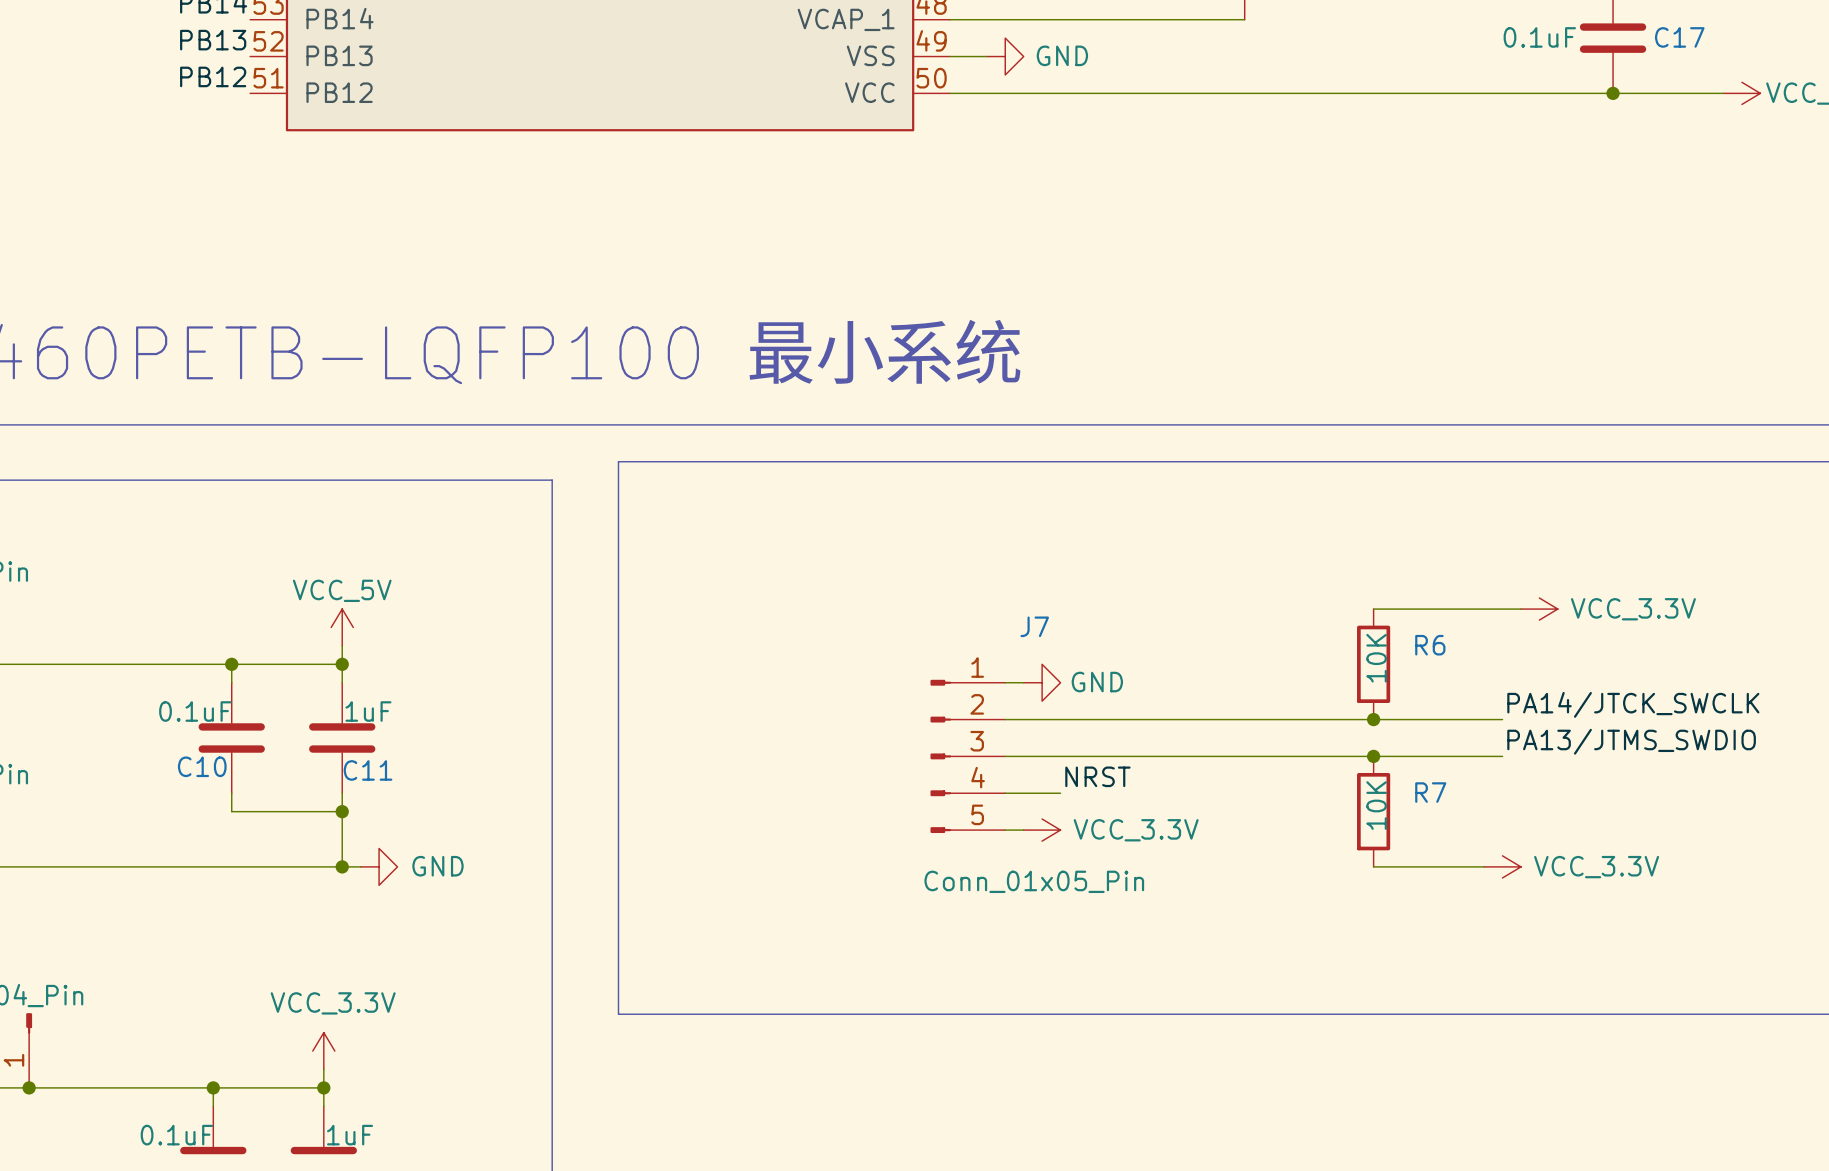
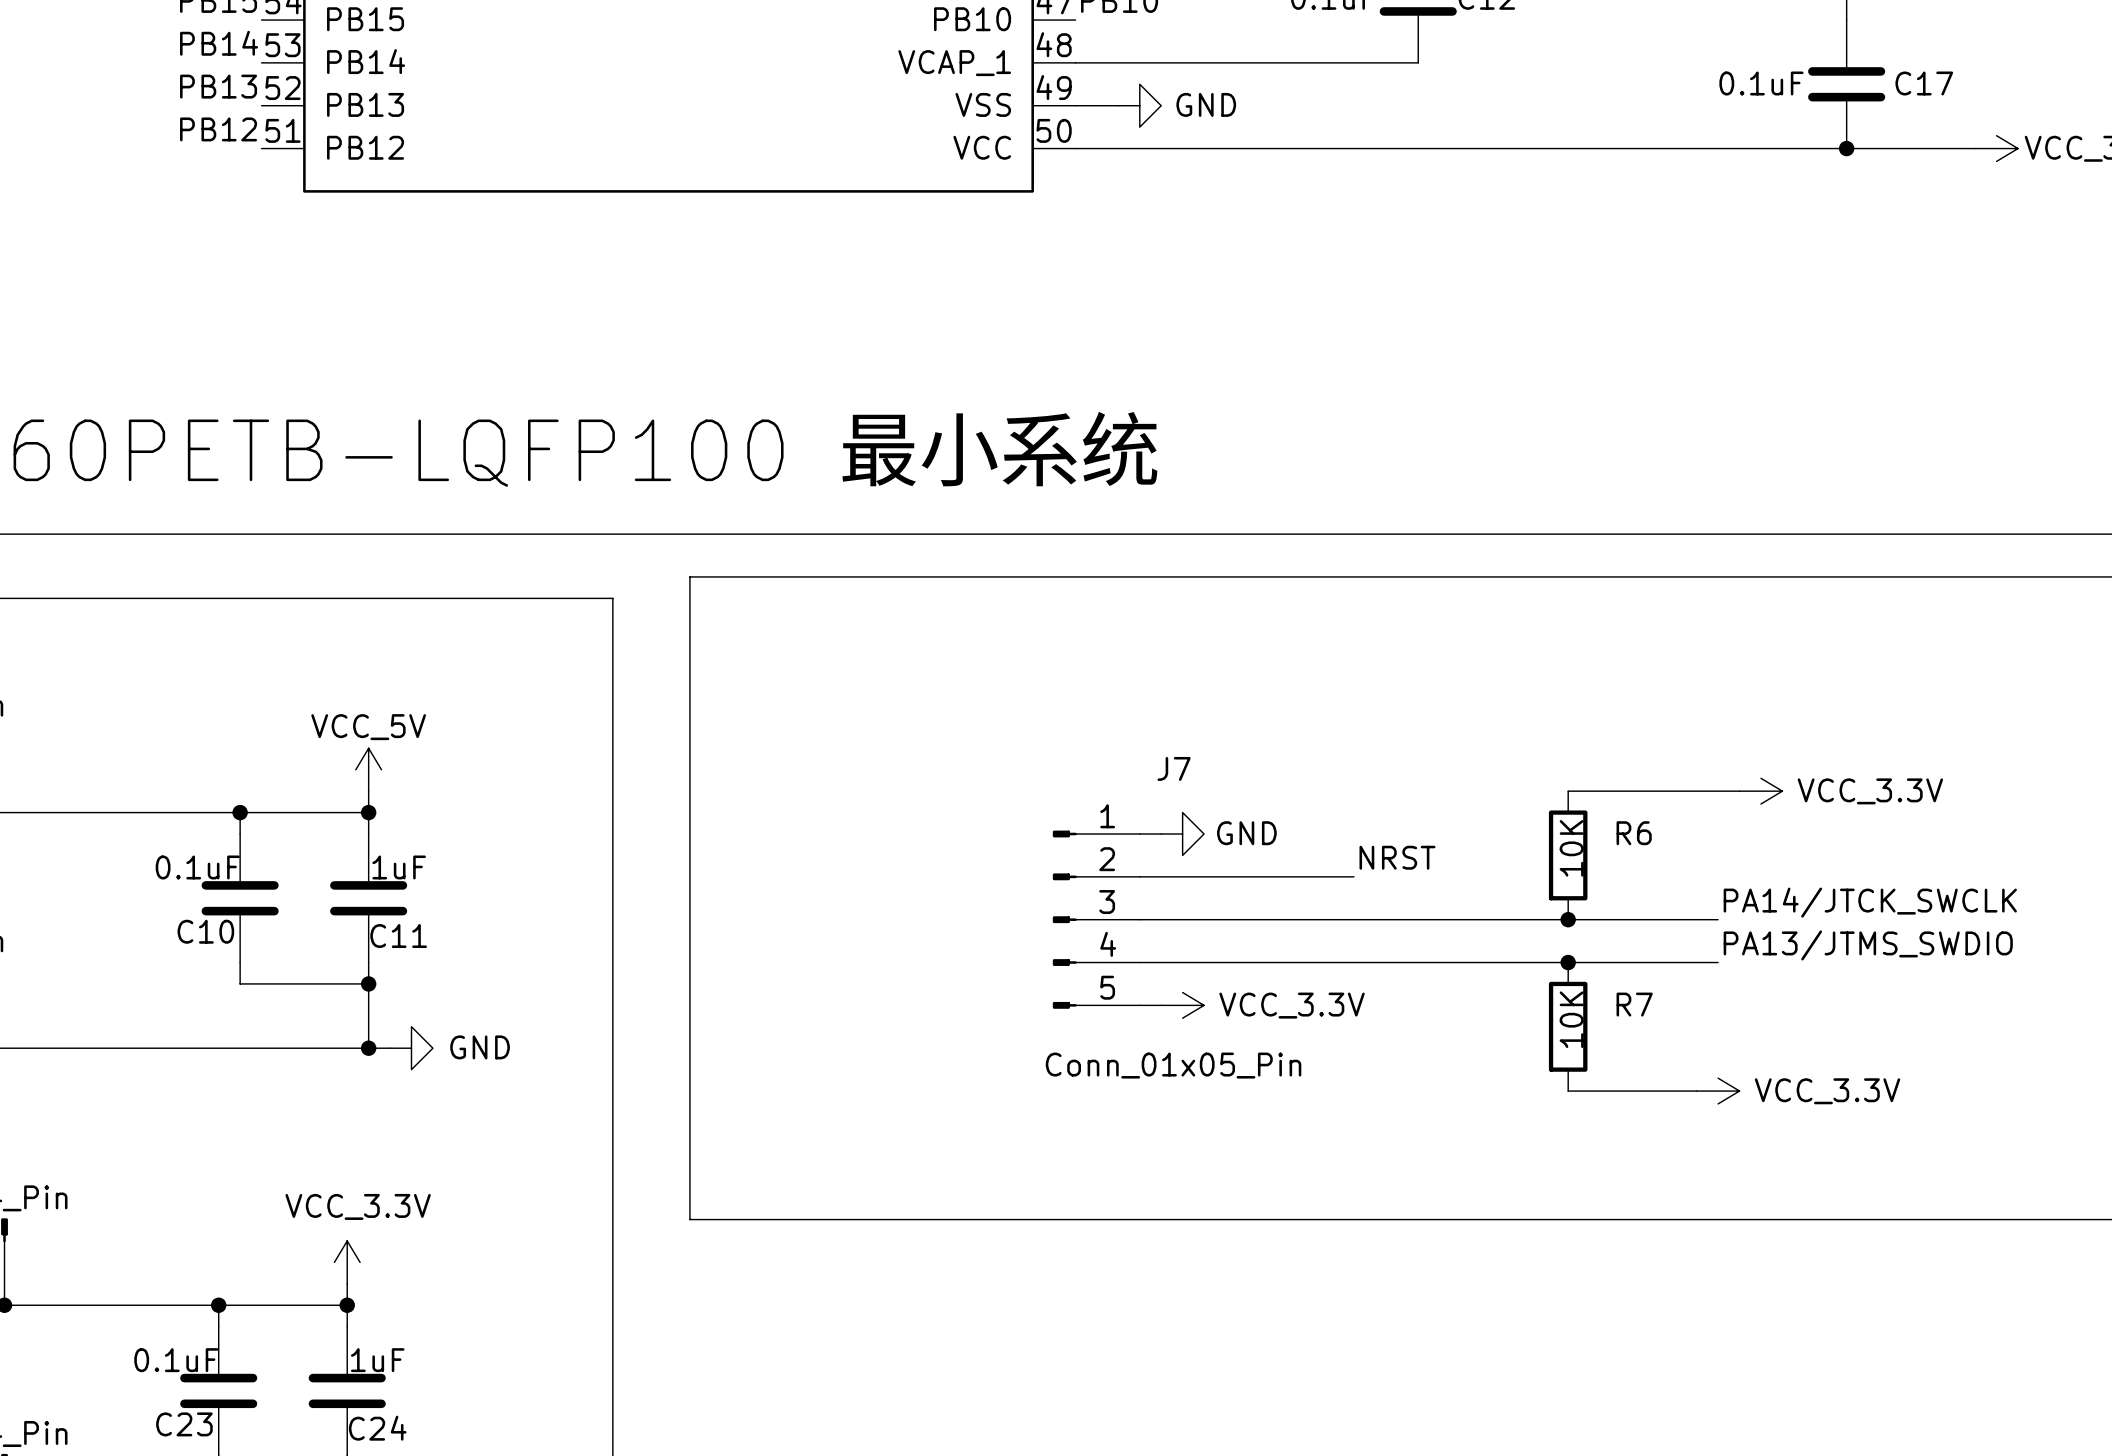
wire: (1373, 609) (1520, 609) -> (1568, 791) (1739, 791)
power symbol position: VCC_3.3V (1539, 609) -> VCC_3.3V (1760, 791)
R6 position: (1373, 664) -> (1568, 855)
label: PA14/JTCK_SWCLK (1633, 704) -> none
wire: (1189, 719) (1502, 719) -> none
junction position: (1373, 719) -> (1568, 962)
label: PA13/JTMS_SWDIO (1631, 741) -> PA14/JTCK_SWCLK (1870, 902)
label position: NRST (1097, 776) -> NRST (1397, 857)
label: none -> PA13/JTMS_SWDIO (1868, 945)
wire: none -> (1204, 962) (1718, 962)
R7 position: (1373, 811) -> (1568, 1026)
wire: (1373, 866) (1484, 866) -> (1568, 1091) (1696, 1091)
power symbol position: VCC_3.3V (1502, 866) -> VCC_3.3V (1718, 1091)

